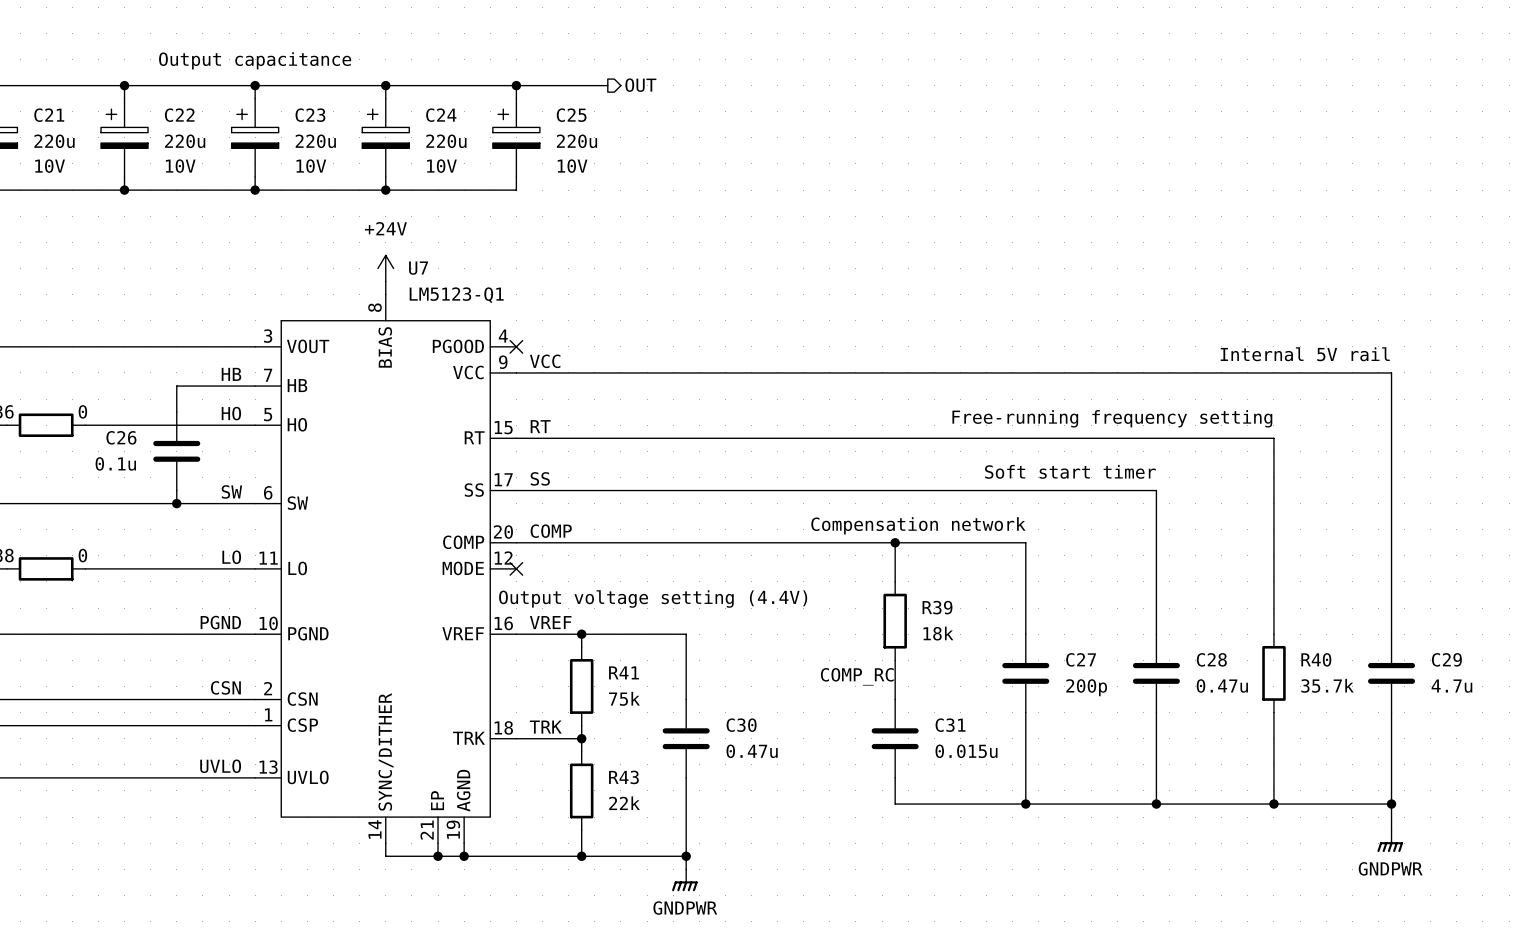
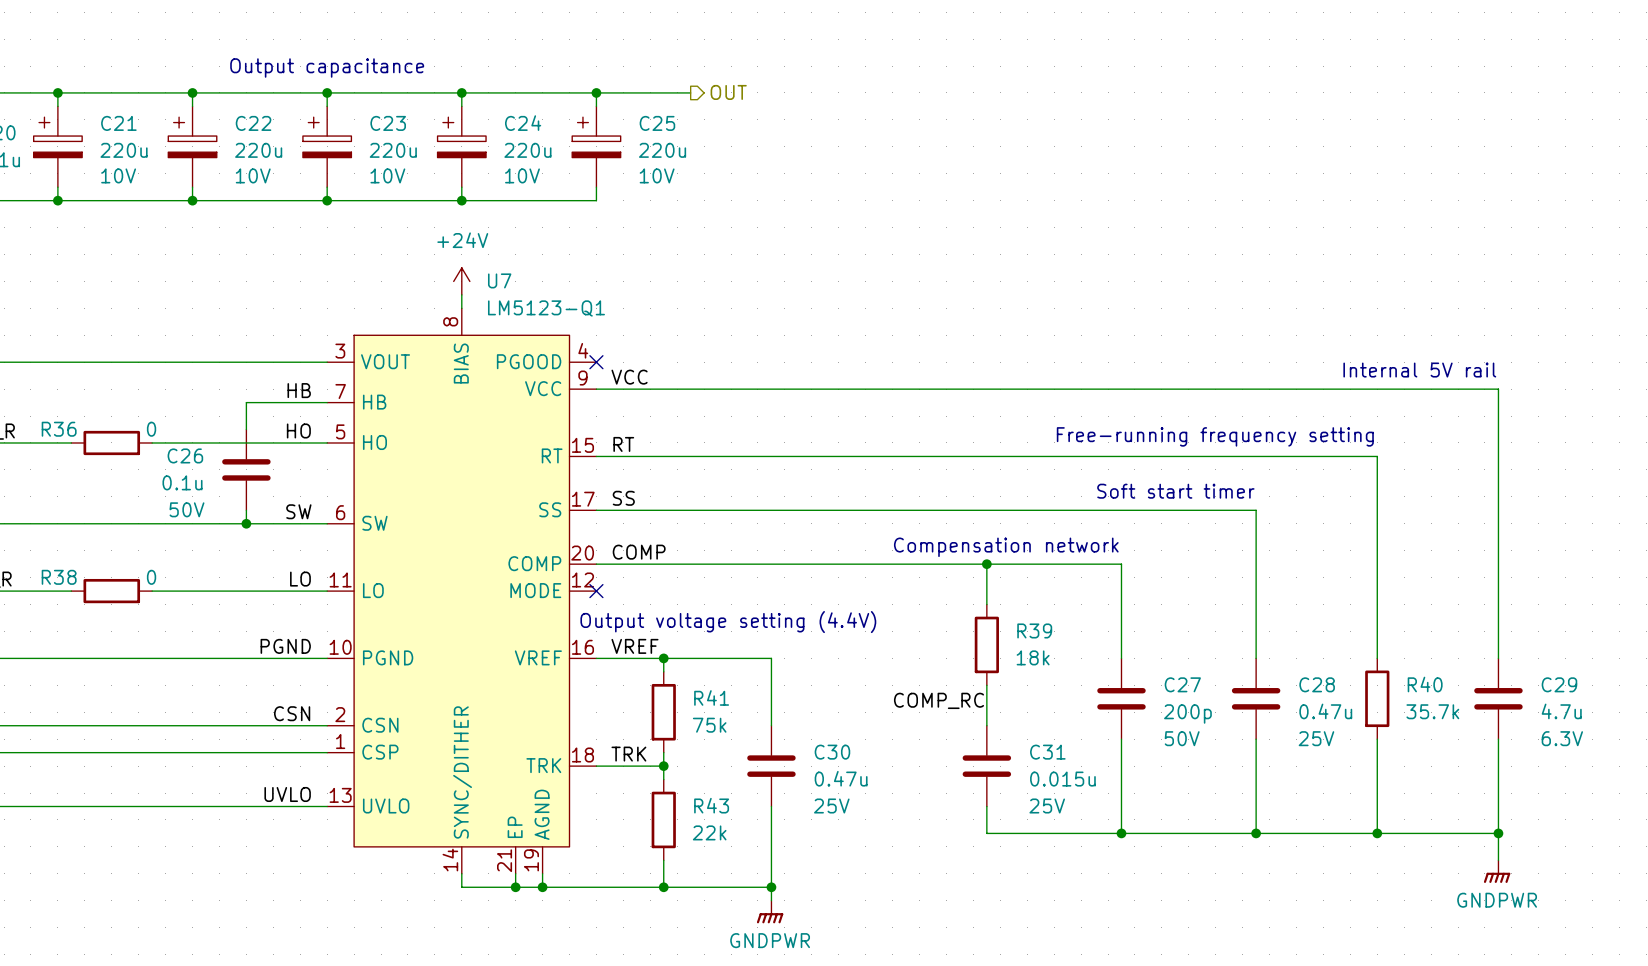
C26 text: none -> 50V (186, 509)
C27 text: none -> 50V (1182, 738)
C28 text: none -> 25V (1316, 738)
C29 text: none -> 6.3V (1562, 738)
C30 text: none -> 25V (831, 805)
C31 text: none -> 25V (1047, 805)

